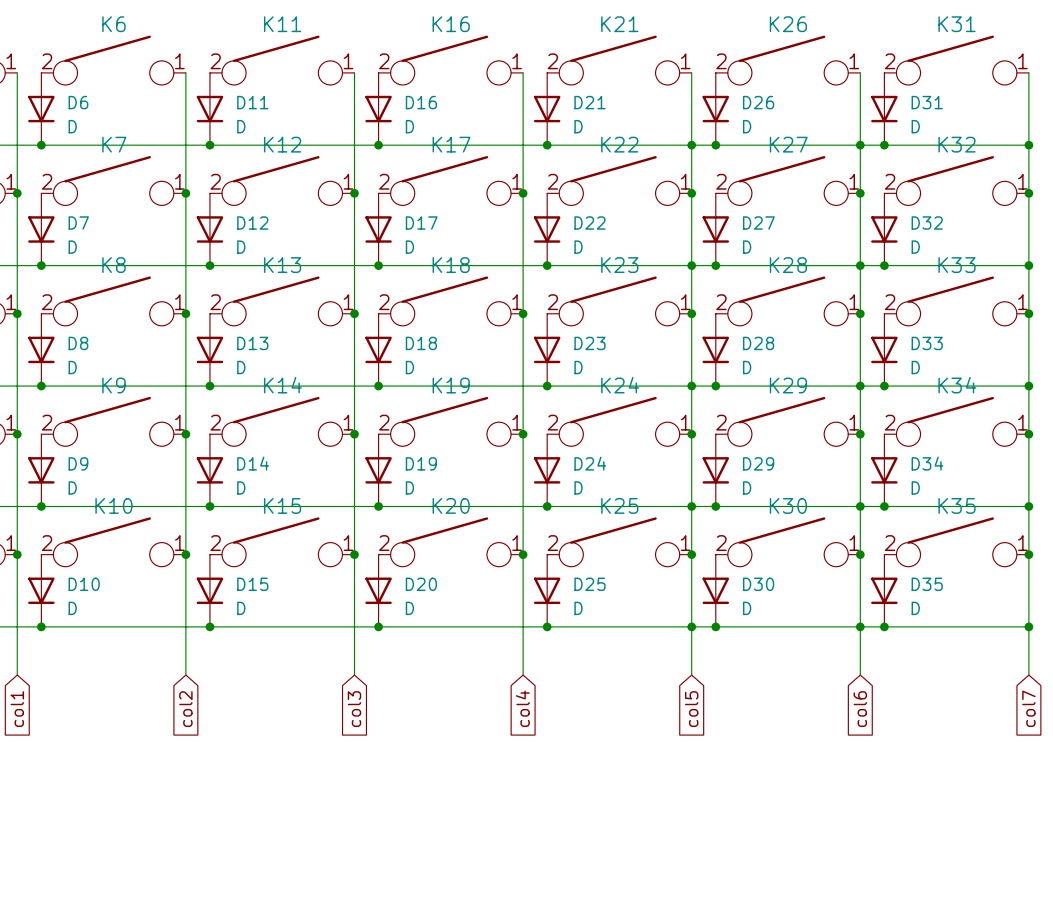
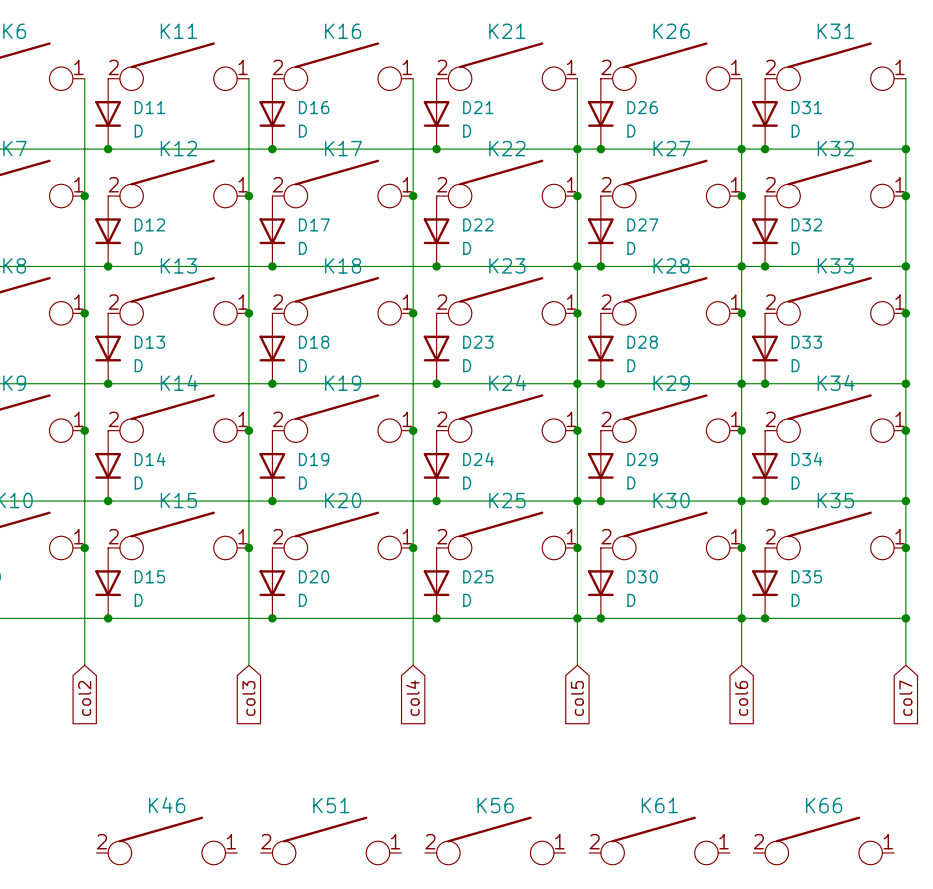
K46: none -> (166, 840)
K51: none -> (331, 840)
K56: none -> (495, 840)
K61: none -> (659, 840)
K66: none -> (823, 840)

